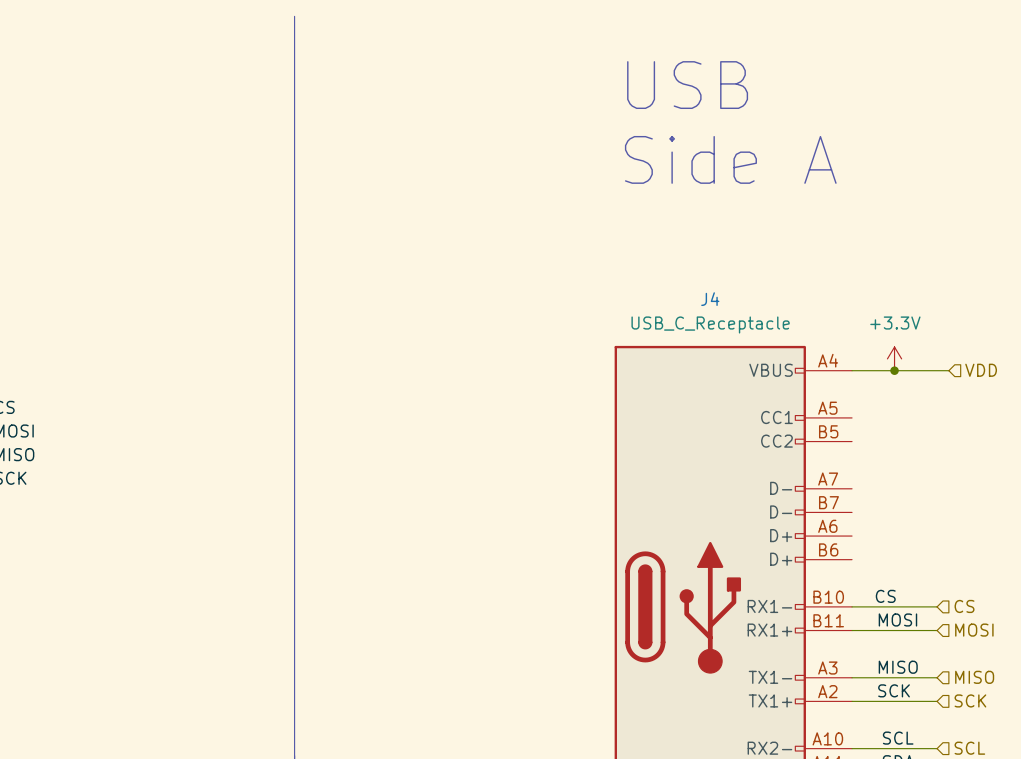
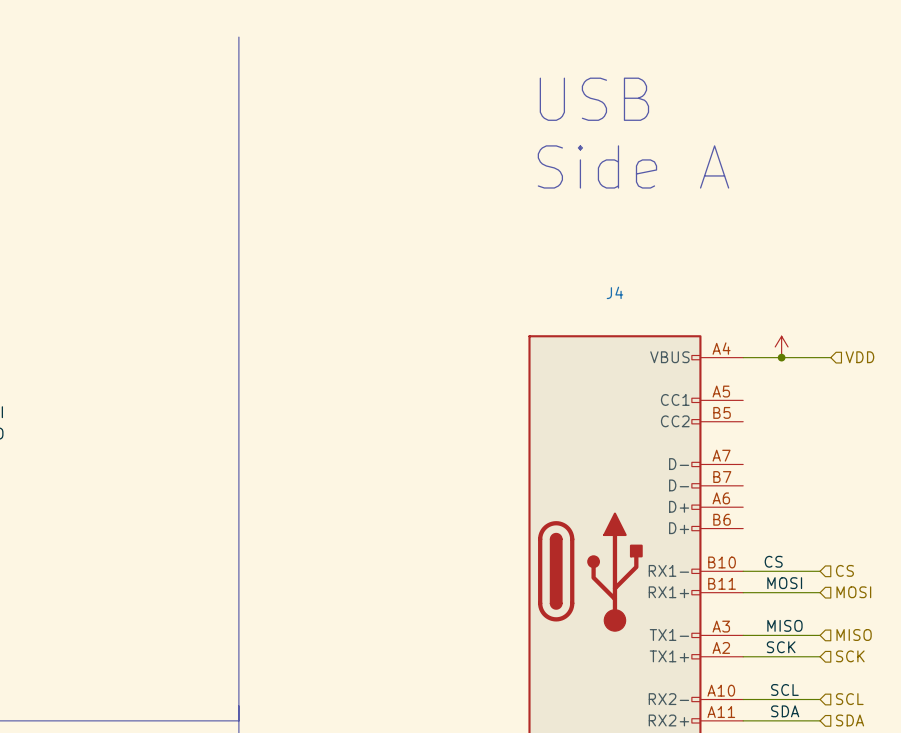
power symbol text: +3.3V (895, 323) -> none
J4 value: USB_C_Receptacle (710, 324) -> none

